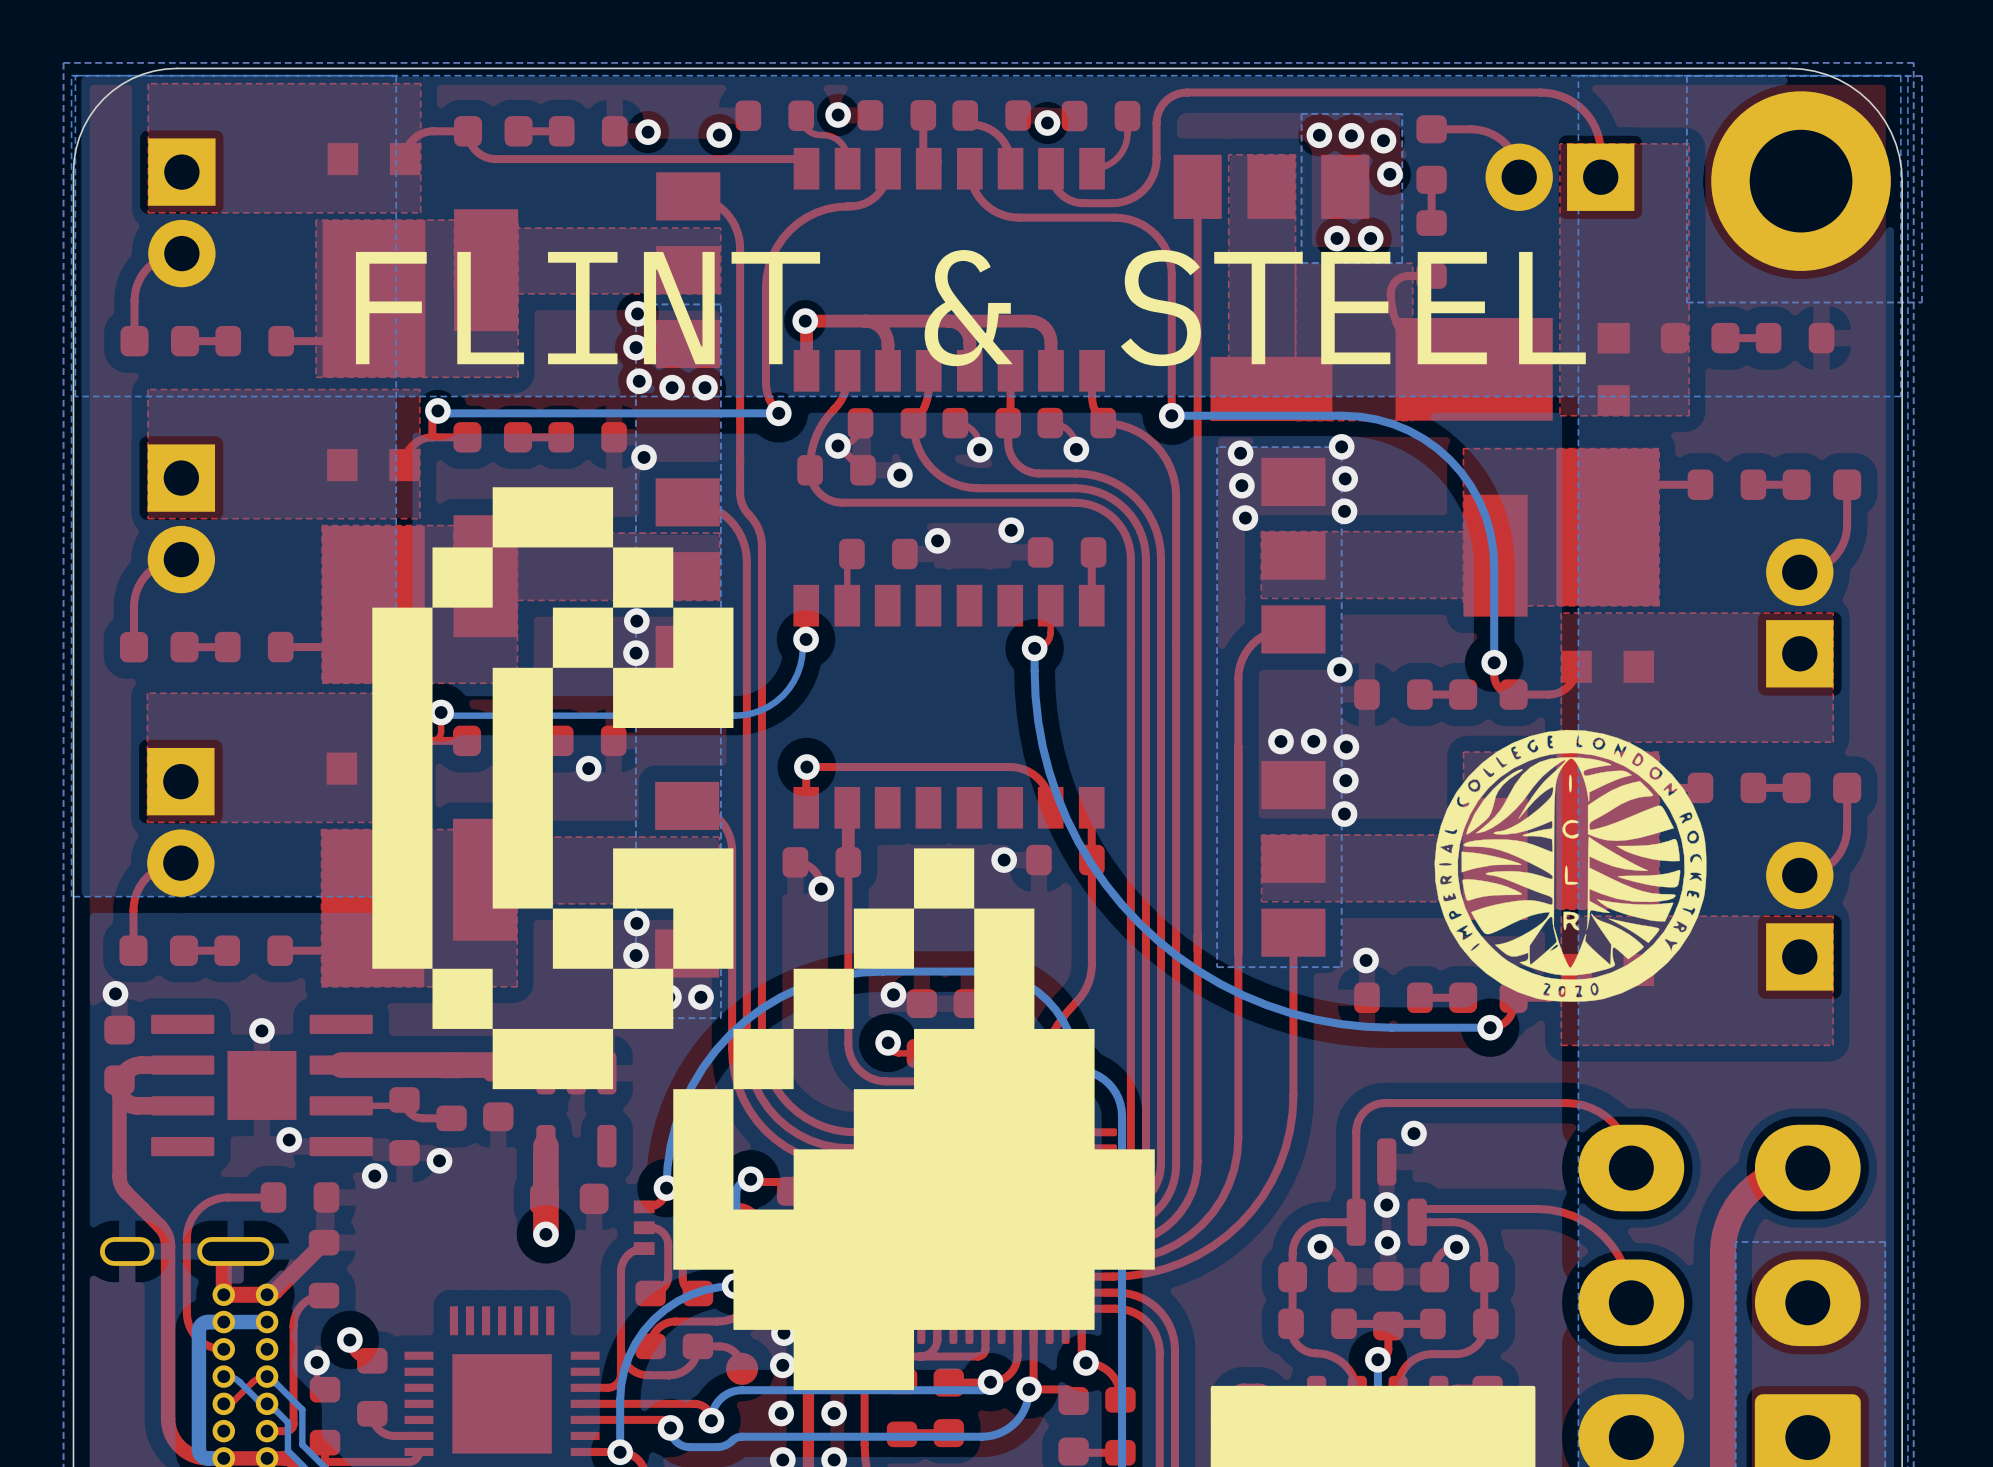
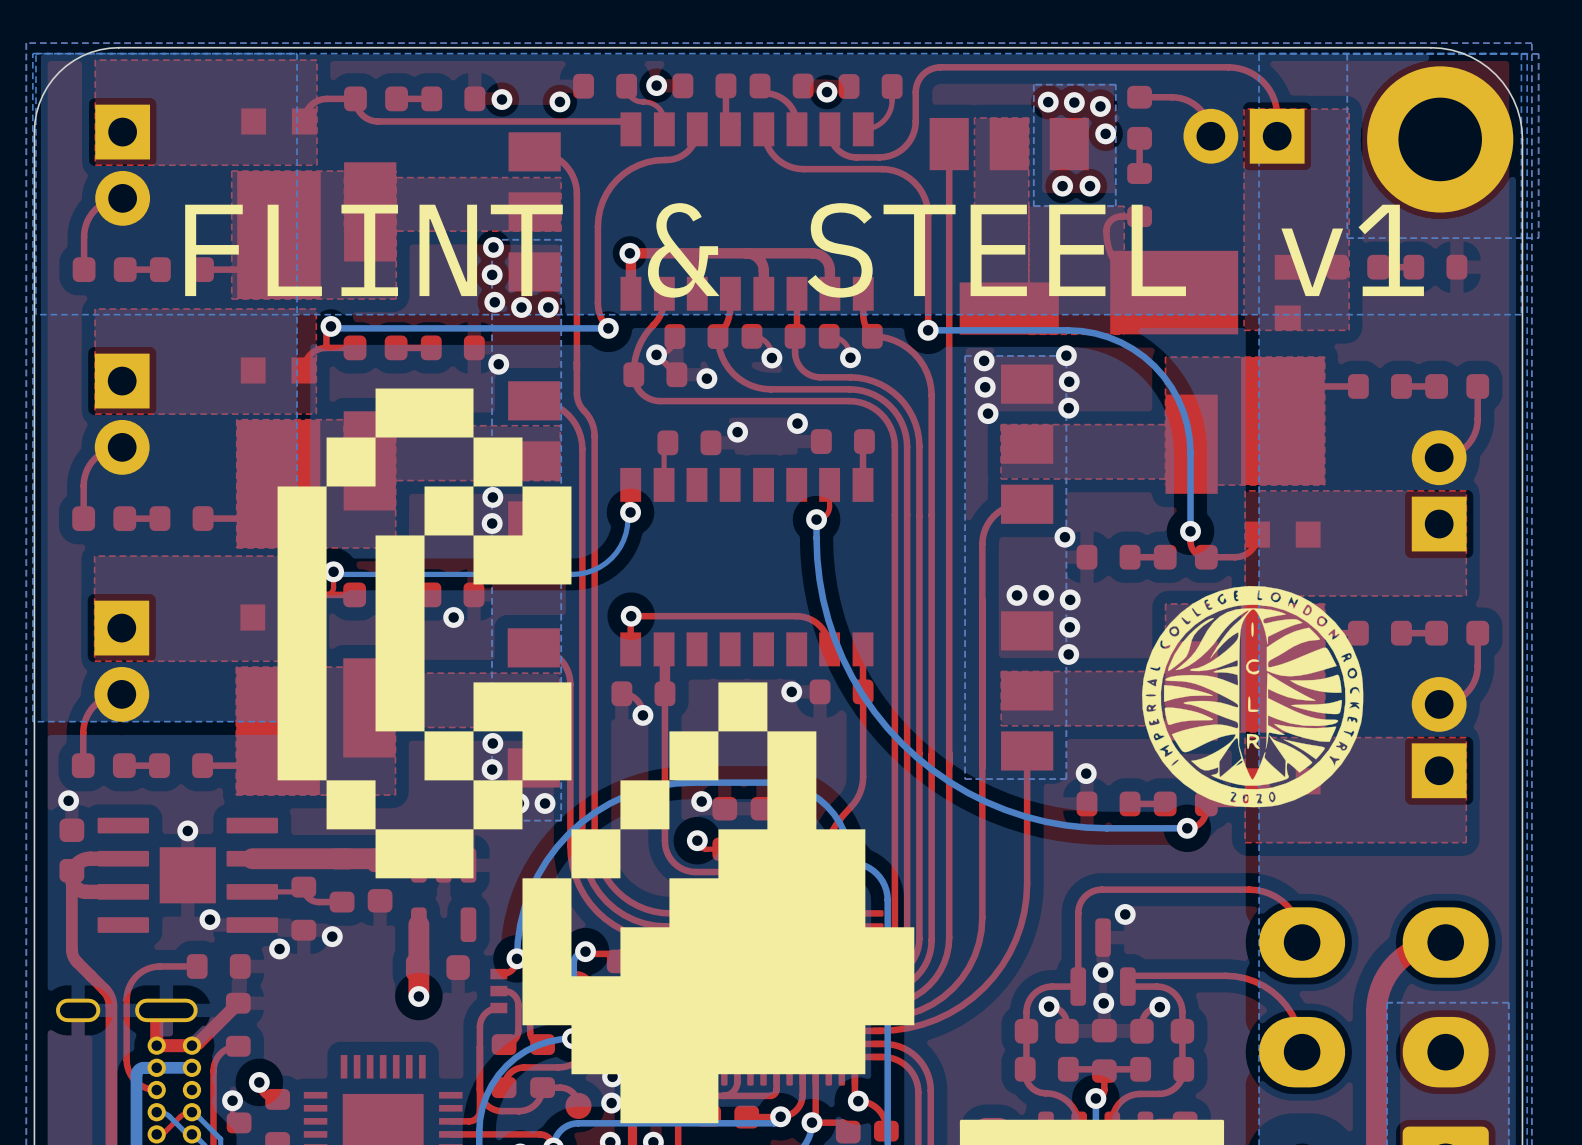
text: FLINT & STEEL (970, 308) -> FLINT & STEEL v1 (804, 250)

